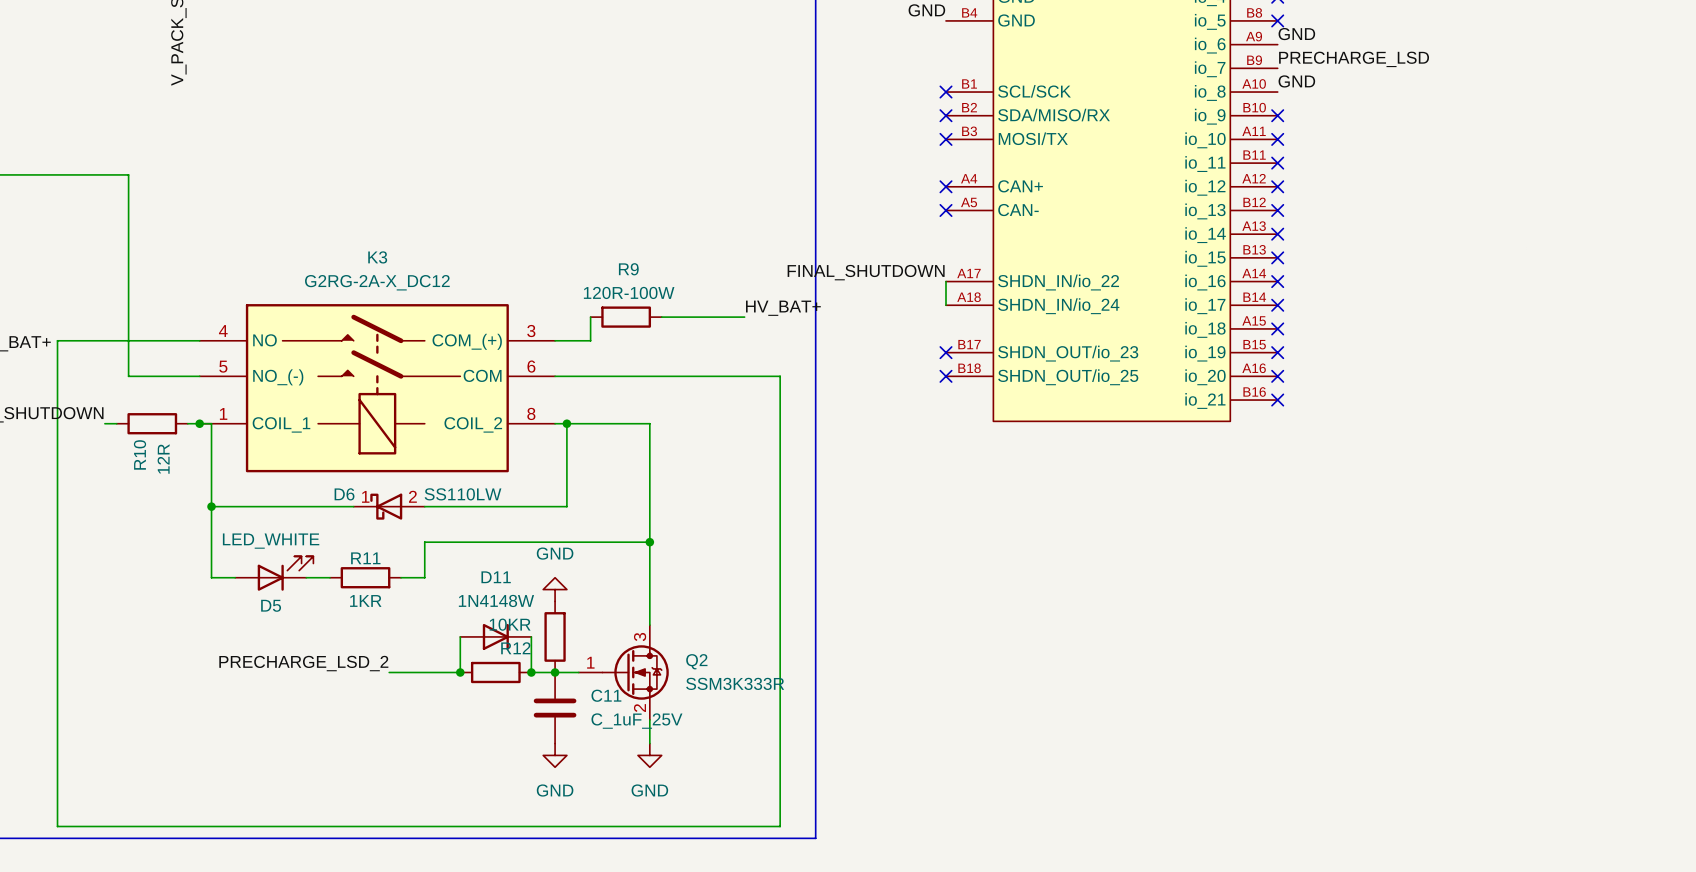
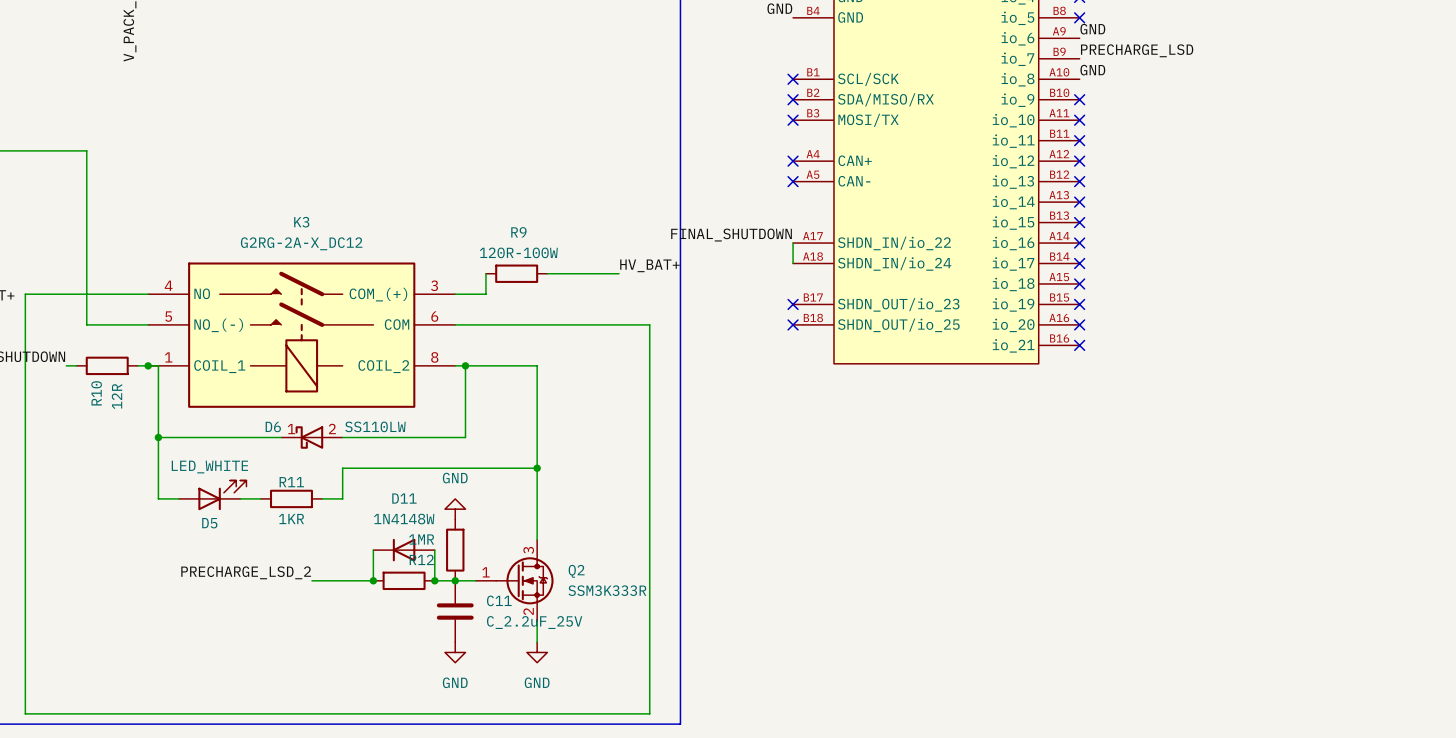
R12 value: 10KR (510, 624) -> 1MR (421, 539)
D11 rotation: 0° (495, 636) -> 180° (404, 550)
C11 value: C_1uF_25V (636, 721) -> C_2.2uF_25V (534, 622)

